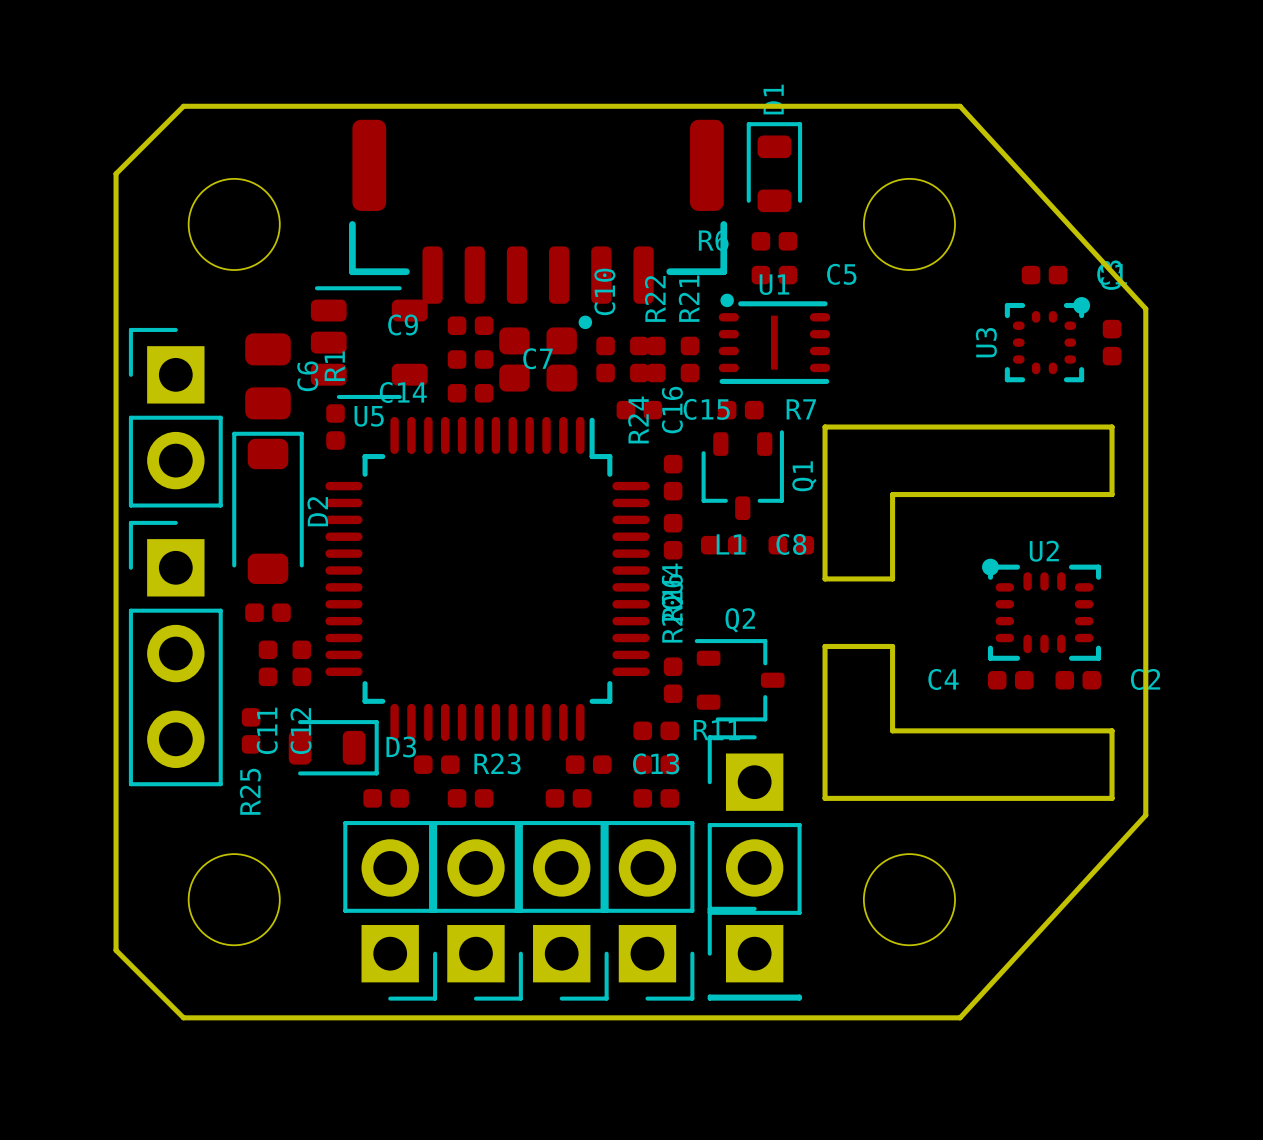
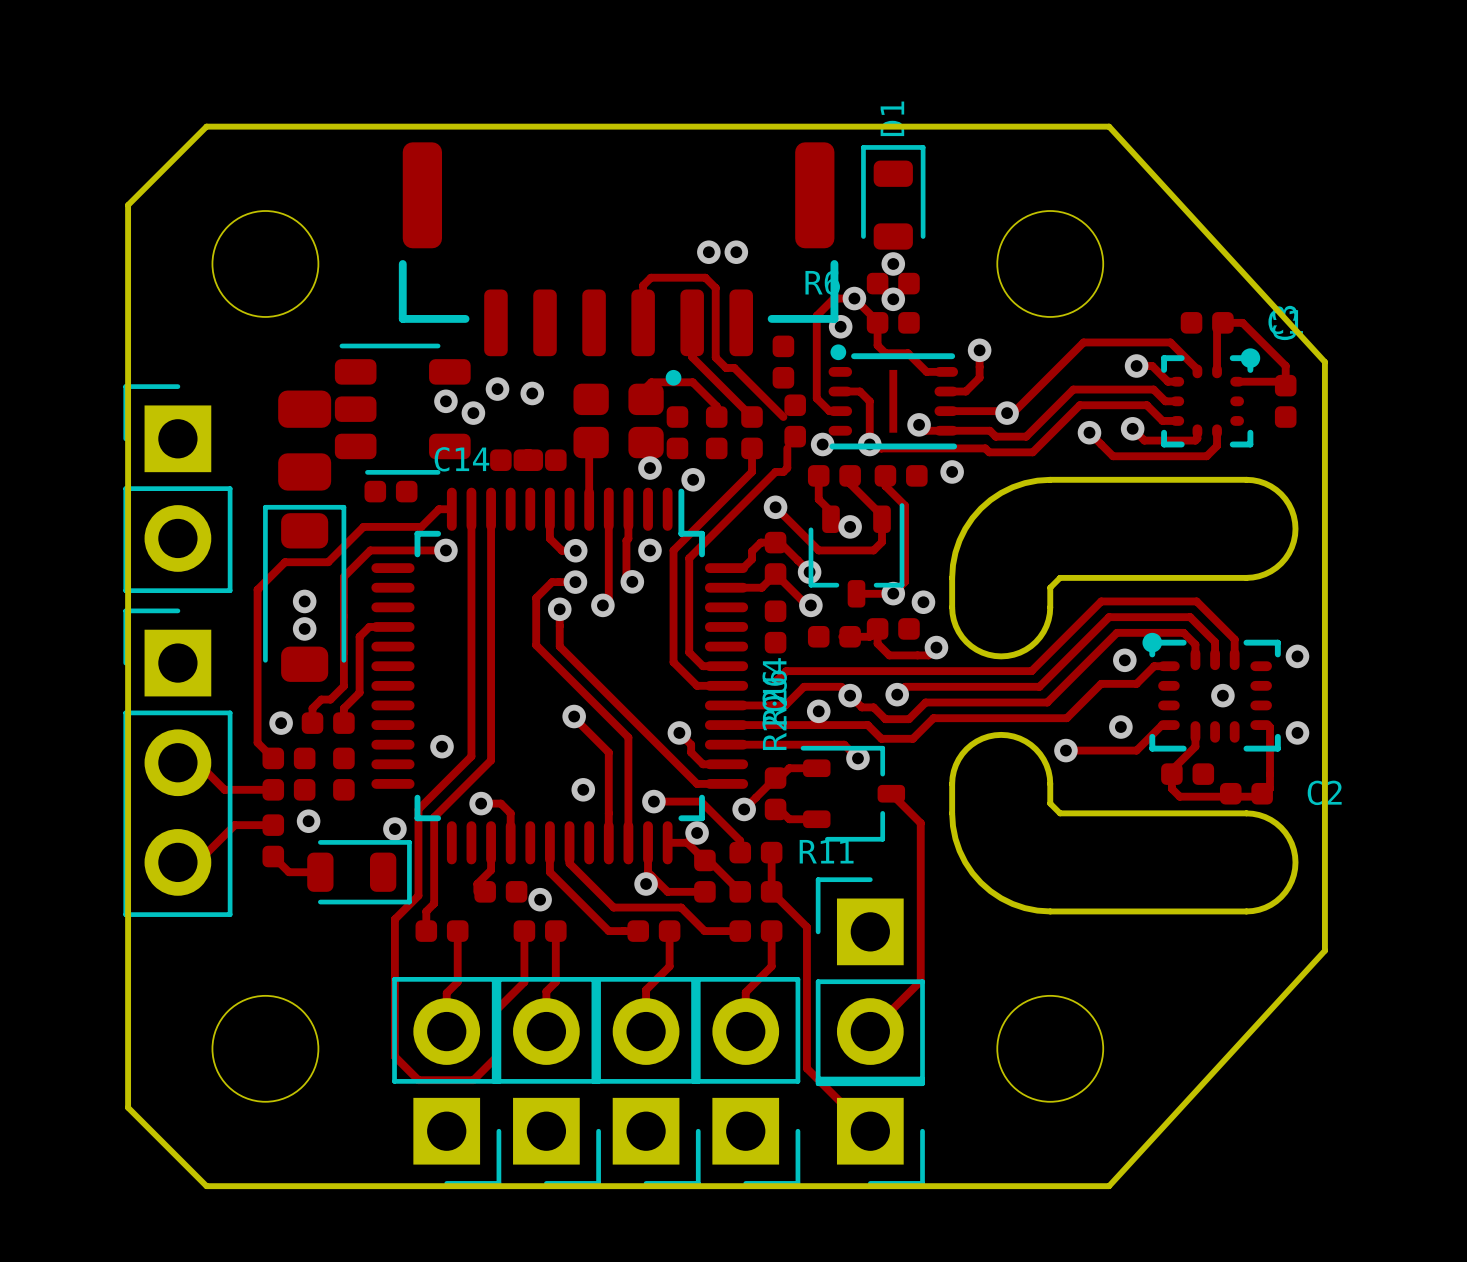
via: none -> (708, 252)
via: none -> (736, 252)
via: none -> (893, 263)
via: none -> (854, 298)
via: none -> (893, 299)
C5 name: C5 (841, 274) -> none
track: none -> (643, 322) (643, 285) (650, 277) (705, 277) (715, 288) (715, 357) (726, 367) (734, 367) (783, 417)
track: none -> (692, 322) (692, 357) (748, 413) (748, 417)
via: none -> (840, 326)
U1 name: U1 (774, 284) -> none
R21 name: R21 (689, 298) -> none
track: none -> (979, 350) (979, 377) (965, 391) (946, 391)
via: none -> (979, 350)
part: none -> (783, 362)
track: none -> (1136, 366) (1152, 366) (1167, 381) (1177, 381)
via: none -> (1136, 366)
track: none -> (1197, 371) (1170, 342) (1083, 342) (1014, 411) (946, 411)
track: none -> (1217, 371) (1217, 328) (1222, 322) (1242, 322) (1285, 366) (1285, 385) (1281, 381) (1237, 381)
track: none -> (946, 371) (926, 371) (908, 353) (885, 353) (877, 345) (877, 321) (854, 298) (834, 298) (816, 315) (816, 398) (829, 411) (840, 411)
C9: (470, 325) -> none
via: none -> (497, 389)
track: none -> (840, 391) (859, 391) (869, 401) (869, 436) (881, 448)
via: none -> (532, 393)
track: none -> (634, 399) (651, 382) (692, 382) (716, 406) (716, 417)
U5 position: (369, 342) -> (402, 409)
via: none -> (445, 401)
U3 name: U3 (986, 342) -> none
track: none -> (1177, 401) (1165, 401) (1153, 389) (1073, 389) (1026, 436) (995, 436) (989, 430) (924, 430) (919, 424)
via: none -> (473, 413)
via: none -> (1007, 413)
C7: (470, 359) -> none
C10: (605, 359) -> none
R24: (639, 359) -> none
R22: (656, 359) -> none
track: none -> (1177, 420) (1162, 420) (1146, 405) (1079, 405) (1032, 452) (989, 452) (985, 448) (873, 448) (869, 444)
via: none -> (919, 424)
track: none -> (1132, 428) (1144, 440) (1195, 440) (1197, 438) (1197, 431)
via: none -> (1132, 428)
track: none -> (1217, 431) (1217, 445) (1206, 456) (1113, 456) (1089, 432)
part: none -> (677, 432)
part: none -> (716, 432)
part: none -> (752, 432)
via: none -> (1089, 432)
C6 name: C6 (307, 376) -> none
track: none -> (579, 442) (589, 452) (589, 509)
via: none -> (822, 444)
via: none -> (869, 444)
track: none -> (752, 448) (752, 471) (673, 550) (673, 662) (697, 685) (726, 685)
track: none -> (787, 448) (787, 468) (783, 471) (775, 471) (689, 558) (689, 652) (702, 666) (726, 666)
part: none -> (516, 460)
via: none -> (649, 468)
via: none -> (952, 471)
part: none -> (901, 475)
R7 name: R7 (801, 409) -> none
via: none -> (693, 479)
C15: (639, 410) -> none
C16 name: C16 (672, 410) -> none
track: none -> (818, 479) (818, 499) (830, 511) (830, 519)
track: none -> (850, 479) (850, 483) (882, 515) (882, 542) (873, 550) (818, 550) (775, 507)
R7 position: (740, 410) -> (834, 475)
track: none -> (885, 479) (885, 486) (905, 505) (905, 581) (893, 593) (856, 593)
U5 name: U5 (369, 416) -> none
part position: (175, 417) -> (177, 488)
part: none -> (390, 491)
R1: (335, 427) -> none
via: none -> (775, 507)
track: none -> (451, 509) (439, 509) (421, 526) (363, 526) (328, 562) (285, 562) (257, 589) (257, 742) (273, 758)
track: none -> (471, 509) (471, 756) (418, 809) (418, 895) (394, 919) (394, 1056) (418, 1080) (473, 1080) (496, 1056) (496, 1009) (524, 982) (524, 931)
track: none -> (491, 509) (491, 760) (434, 817) (434, 903) (426, 911) (426, 931)
track: none -> (549, 509) (549, 538) (561, 550) (575, 550)
track: none -> (608, 509) (608, 599) (602, 605)
track: none -> (628, 509) (626, 575) (632, 581)
via: none -> (850, 526)
track: none -> (445, 550) (370, 550) (343, 576) (343, 686) (330, 699) (321, 699) (312, 708) (312, 723)
via: none -> (445, 550)
via: none -> (649, 550)
via: none -> (575, 550)
Q1 name: Q1 (804, 476) -> none
track: none -> (726, 568) (743, 568) (752, 559) (752, 551) (760, 542) (780, 542) (809, 572)
via: none -> (809, 572)
board edge: (825, 494) (825, 427) (1112, 427) (1112, 494) (1078, 494) -> (952, 577) (952, 565) (959, 540) (965, 528) (980, 508) (990, 500) (1012, 487) (1037, 480) (1050, 479) (1246, 479) (1259, 481) (1270, 486) (1285, 499) (1291, 510) (1295, 522) (1293, 541) (1285, 558) (1276, 567) (1259, 576) (1246, 577)
board edge: (917, 494) (892, 494) (892, 578) (825, 578) (825, 519) -> (1060, 577) (1050, 587) (1049, 613) (1043, 631) (1031, 646) (1013, 654) (994, 655) (982, 652) (971, 646) (962, 637) (955, 626) (952, 607)
via: none -> (632, 581)
track: none -> (575, 582) (552, 582) (536, 598) (536, 645) (628, 737) (628, 842)
via: none -> (575, 582)
track: none -> (726, 587) (761, 587) (775, 573) (806, 605) (810, 605)
via: none -> (893, 593)
D2 name: D2 (317, 511) -> none
via: none -> (304, 601)
via: none -> (923, 602)
via: none -> (602, 605)
via: none -> (810, 605)
track: none -> (559, 609) (559, 646) (697, 783) (726, 783)
via: none -> (559, 609)
track: none -> (392, 626) (369, 626) (359, 636) (359, 692) (343, 708) (343, 723)
via: none -> (304, 628)
L1 name: L1 (731, 544) -> none
C8 name: C8 (791, 544) -> none
track: none -> (842, 636) (869, 636) (877, 628) (877, 643) (889, 655) (928, 655) (936, 647)
L1 position: (791, 545) -> (893, 628)
U2 name: U2 (1044, 551) -> none
via: none -> (936, 647)
via: none -> (1297, 656)
track: none -> (1195, 659) (1195, 644) (1183, 632) (1116, 632) (1047, 702) (925, 702) (908, 719) (885, 719) (873, 707) (861, 707) (841, 686) (804, 686) (785, 705) (726, 705)
track: none -> (1215, 659) (1215, 642) (1190, 617) (1109, 617) (1039, 686) (905, 686) (897, 694)
track: none -> (1234, 659) (1234, 639) (1196, 601) (1101, 601) (1031, 671) (786, 671) (775, 681)
via: none -> (1124, 660)
track: none -> (1168, 666) (1154, 666) (1136, 683) (1101, 683) (1066, 718) (933, 718) (912, 738) (881, 738) (867, 725) (726, 725)
via: none -> (897, 694)
via: none -> (850, 695)
via: none -> (1222, 695)
via: none -> (818, 711)
U2 position: (1041, 609) -> (1211, 692)
part position: (267, 612) -> (328, 723)
track: none -> (574, 716) (608, 752) (608, 842)
via: none -> (574, 716)
via: none -> (281, 723)
Q2 name: Q2 (740, 620) -> none
track: none -> (1168, 725) (1162, 725) (1136, 750) (1065, 750)
track: none -> (1261, 725) (1270, 727) (1270, 788) (1262, 796) (1179, 796) (1171, 788) (1171, 770) (1195, 746) (1195, 731)
via: none -> (1120, 727)
track: none -> (679, 732) (691, 744) (691, 752) (702, 764) (726, 764)
via: none -> (679, 732)
via: none -> (1297, 732)
track: none -> (726, 744) (844, 744) (857, 758)
via: none -> (442, 746)
via: none -> (1065, 750)
via: none -> (857, 758)
track: none -> (197, 762) (224, 789) (273, 789)
part position: (175, 653) -> (177, 762)
track: none -> (816, 768) (789, 768) (779, 778) (775, 778) (744, 809)
part: none -> (273, 774)
board edge: (825, 671) (825, 646) (892, 646) (892, 730) (1112, 730) (1112, 798) (825, 798) (825, 697) -> (952, 783) (955, 765) (962, 754) (971, 745) (982, 738) (994, 735) (1013, 736) (1031, 745) (1043, 759) (1049, 777) (1050, 803) (1060, 813) (1246, 813) (1259, 815) (1270, 819) (1285, 832) (1293, 849) (1295, 868) (1291, 881) (1281, 897) (1270, 904) (1252, 911) (1037, 910) (1012, 904) (990, 891) (980, 882) (965, 862) (959, 850) (952, 826) (952, 813)
via: none -> (583, 789)
C4 name: C4 (943, 679) -> none
track: none -> (891, 793) (920, 823) (920, 981) (870, 1031)
C4 position: (1010, 680) -> (1187, 774)
track: none -> (653, 801) (701, 801) (740, 840) (740, 856)
via: none -> (653, 801)
track: none -> (481, 803) (500, 803) (510, 813) (510, 842)
via: none -> (481, 803)
via: none -> (744, 809)
track: none -> (779, 809) (789, 819) (816, 819)
via: none -> (308, 821)
track: none -> (273, 825) (234, 825) (197, 862)
via: none -> (394, 829)
via: none -> (697, 832)
track: none -> (491, 842) (491, 870) (477, 883) (477, 891)
track: none -> (549, 842) (549, 872) (608, 931) (638, 931)
track: none -> (569, 842) (569, 863) (613, 907) (681, 907) (704, 931) (740, 931)
track: none -> (648, 842) (648, 872) (667, 891) (704, 891)
track: none -> (667, 842) (687, 842)
track: none -> (687, 842) (704, 860) (708, 860) (740, 891)
R25 position: (251, 730) -> (273, 840)
C11 name: C11 (267, 730) -> none
C12 name: C12 (301, 731) -> none
track: none -> (273, 856) (288, 872) (320, 872)
track: none -> (771, 856) (771, 891) (806, 927) (806, 1068) (869, 1131)
D3 position: (333, 747) -> (359, 872)
D3 name: D3 (401, 747) -> none
part: none -> (704, 876)
via: none -> (646, 883)
R23 name: R23 (497, 763) -> none
C13: (588, 764) -> none
via: none -> (540, 899)
R25 name: R25 (250, 791) -> none
track: none -> (457, 931) (457, 982) (446, 993) (446, 1031)
track: none -> (555, 931) (555, 982) (546, 991) (546, 1031)
track: none -> (669, 931) (669, 966) (646, 989) (646, 1031)
track: none -> (771, 931) (771, 966) (745, 992) (745, 1031)
part position: (754, 825) -> (870, 981)
part position: (390, 910) -> (446, 1081)
part position: (475, 910) -> (546, 1081)
part position: (561, 910) -> (646, 1081)
part position: (647, 910) -> (745, 1081)
part rotation: 0° (754, 953) -> 180° (870, 1131)

